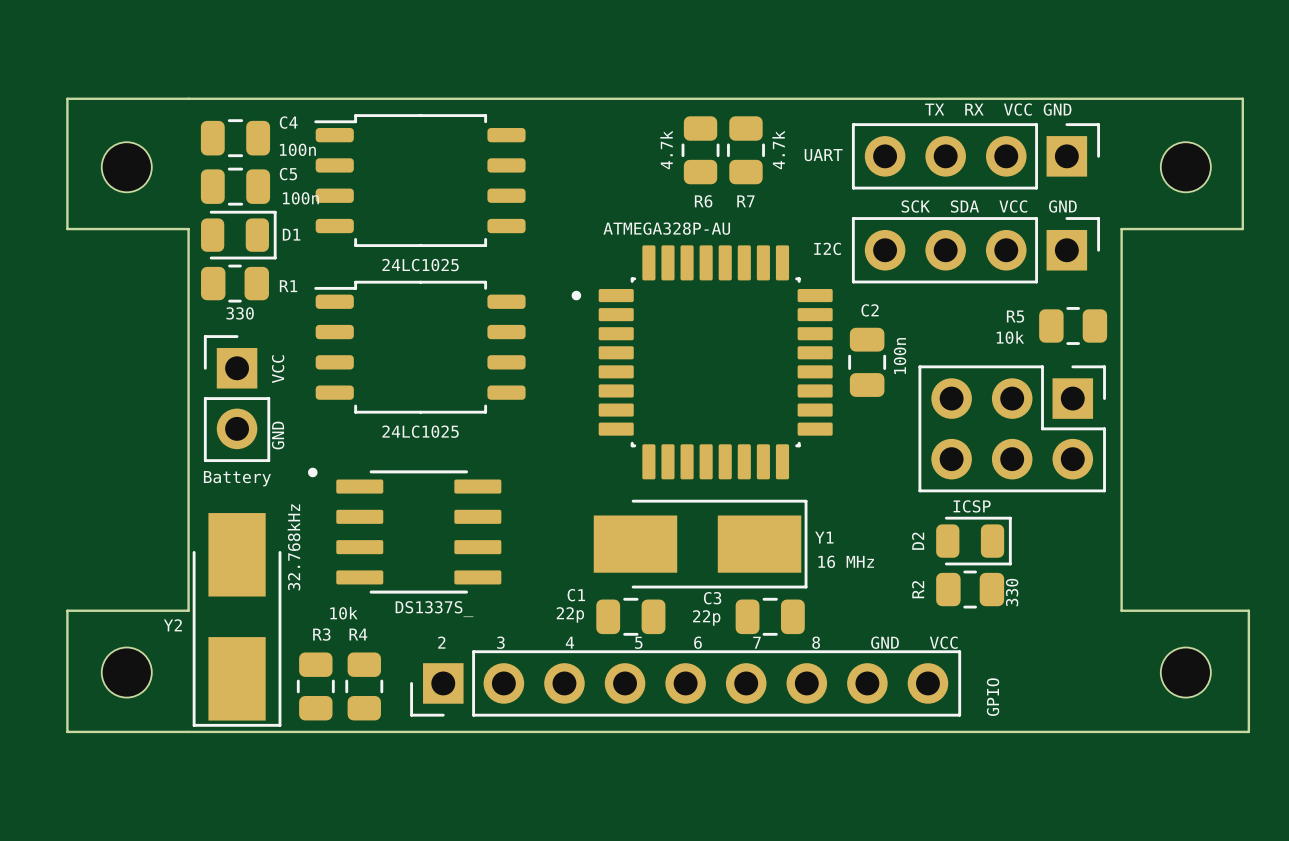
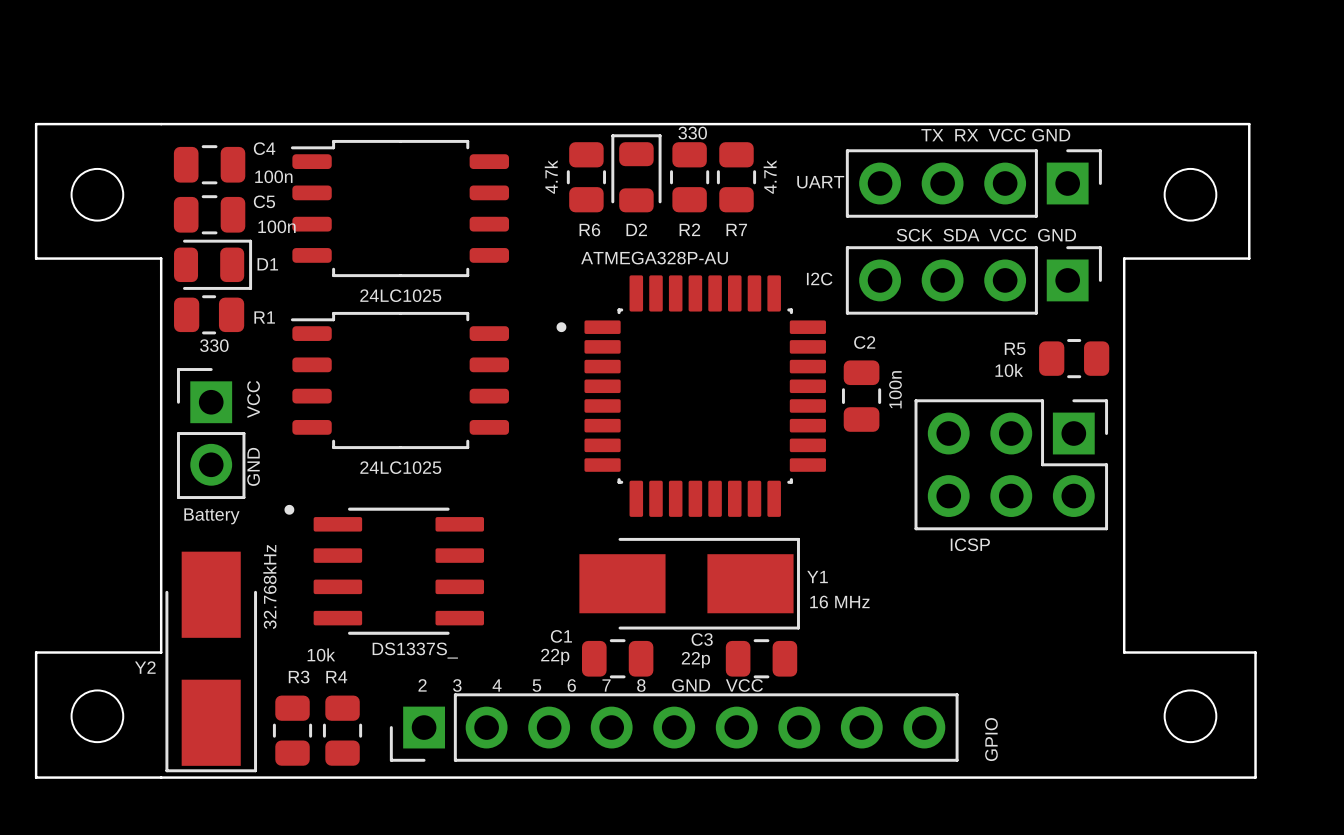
R6: none -> 4.7k (586, 177)
R6 value: 4.7k (666, 150) -> 330 (692, 133)
R6 name: R6 (703, 201) -> R2 (689, 229)
D2 rotation: 0° (973, 541) -> 90° counterclockwise (636, 173)
D2 position: (973, 541) -> (636, 173)
R2: 330 (970, 589) -> none

